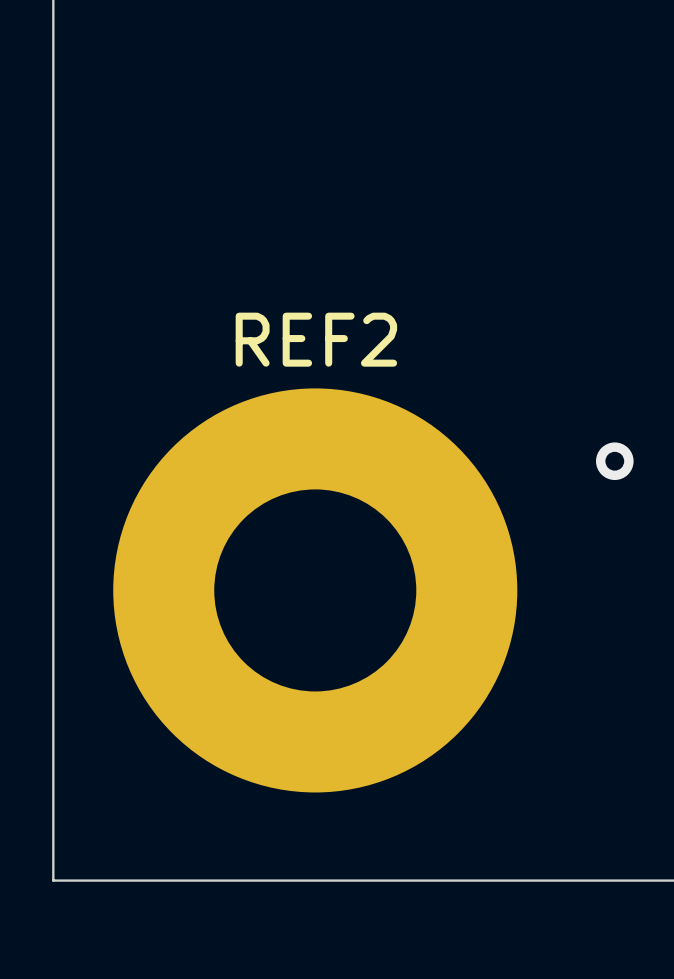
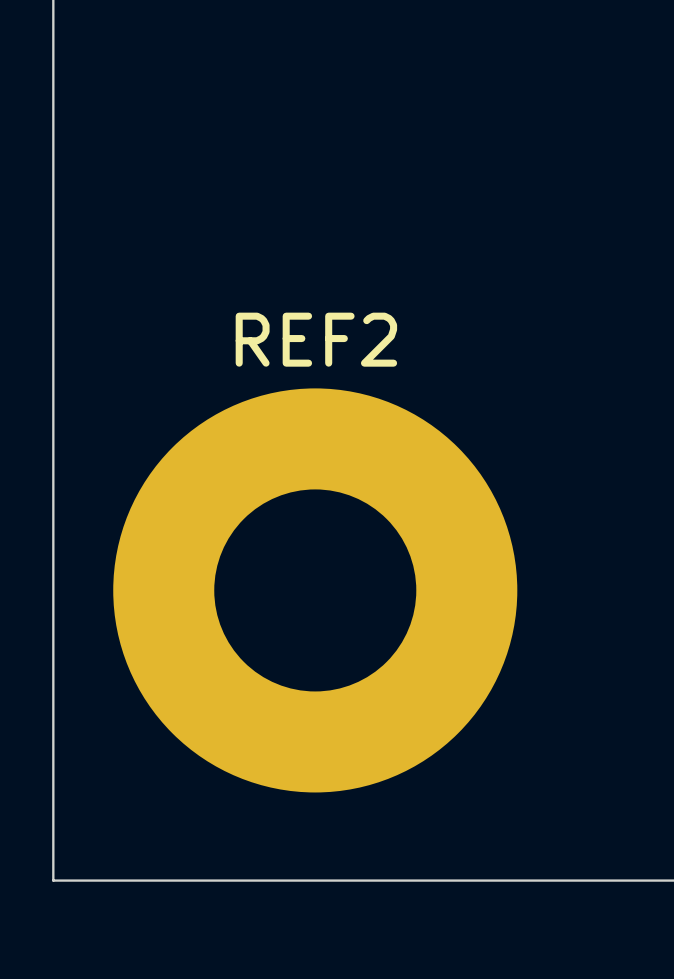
via: (614, 461) -> none

